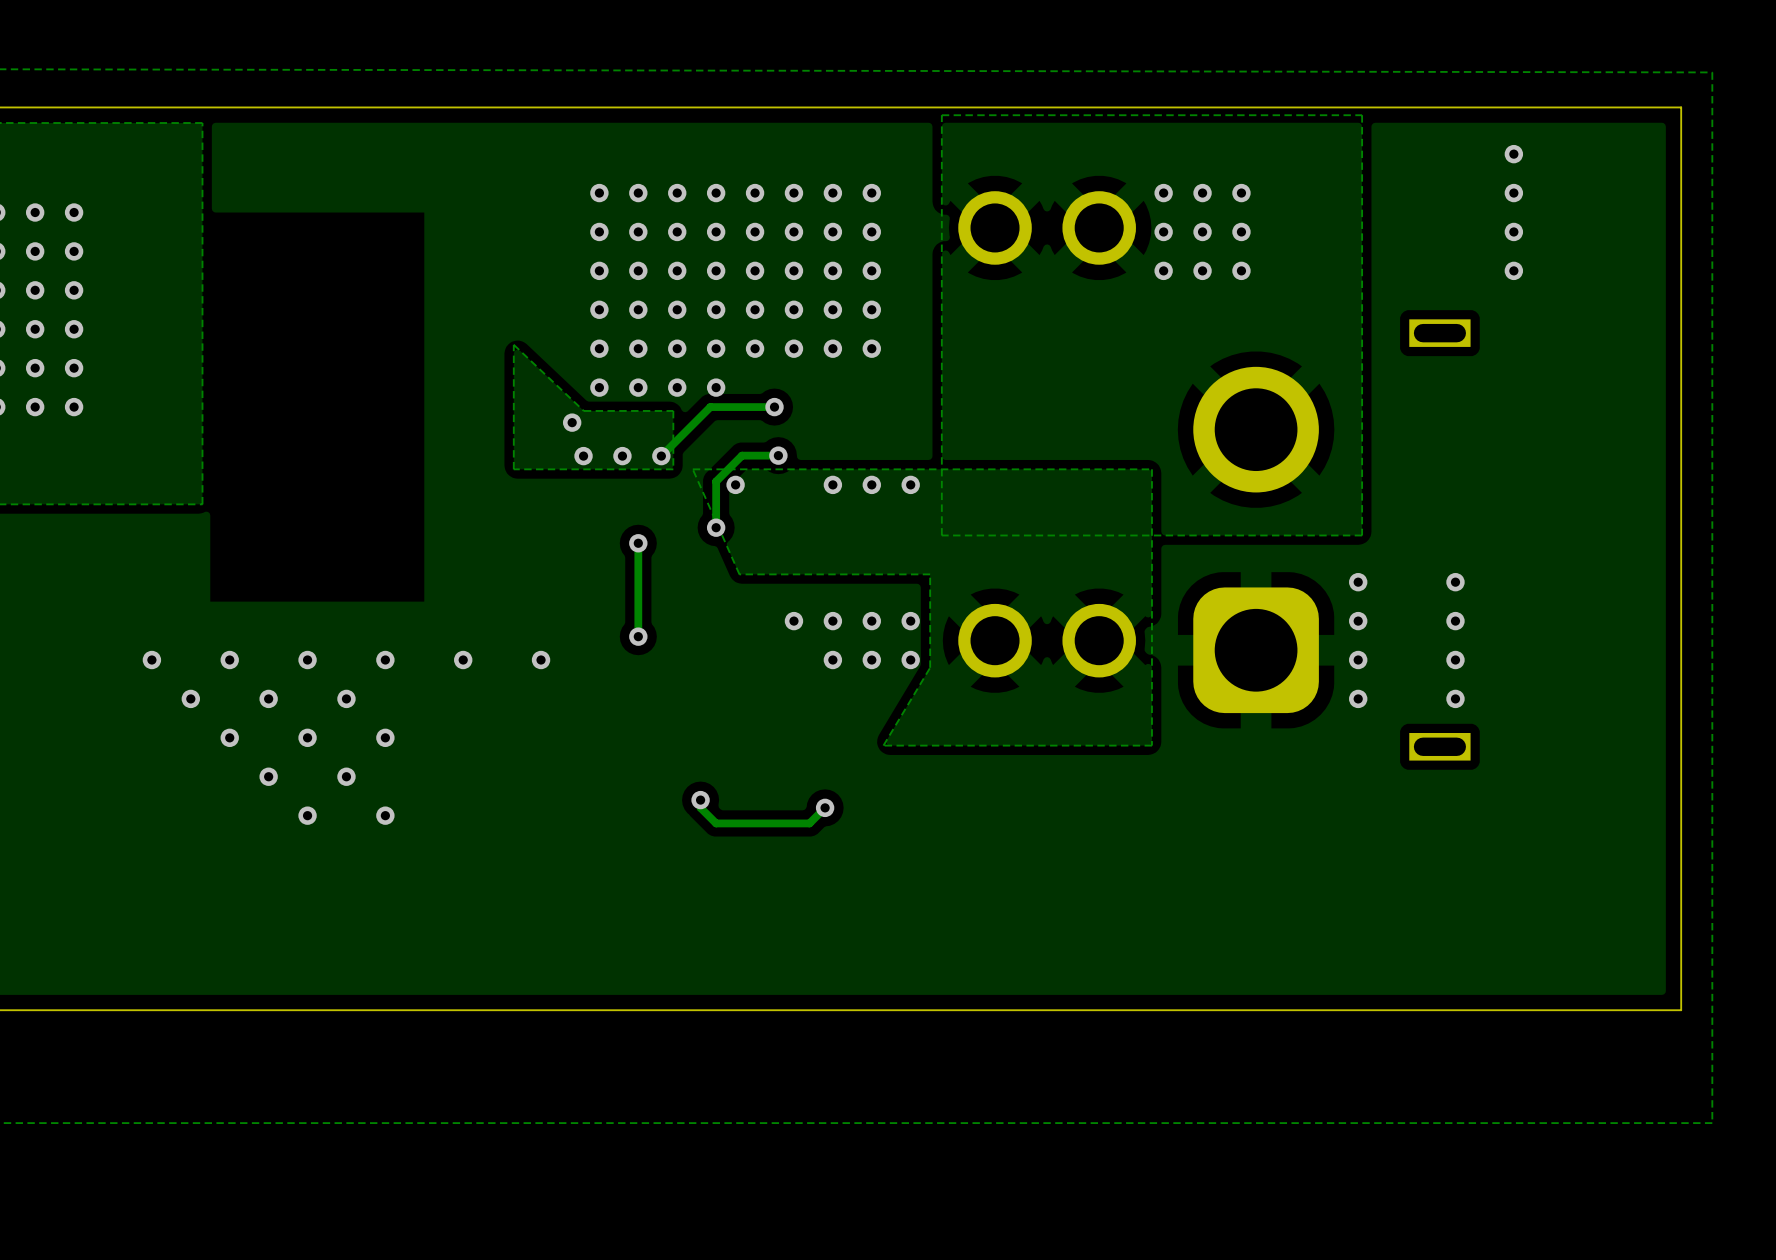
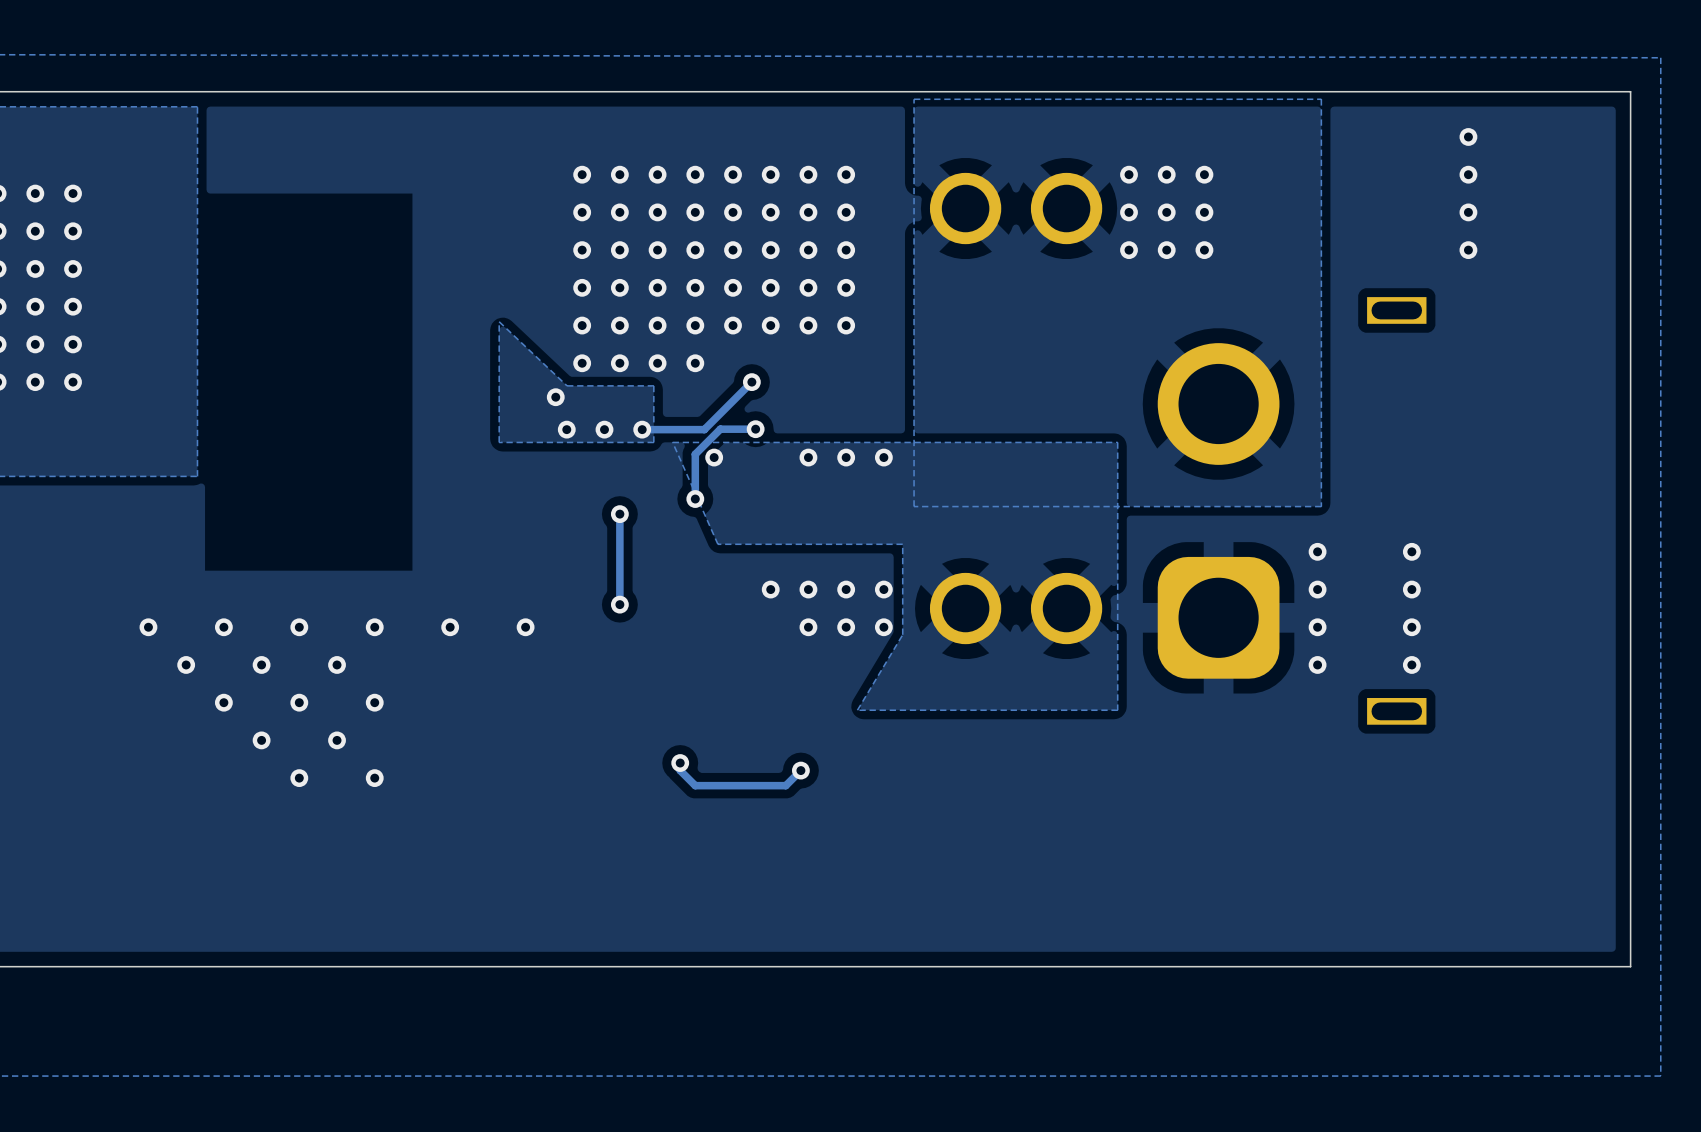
track: (774, 407) (710, 407) (661, 456) -> (751, 382) (704, 429) (642, 429)

